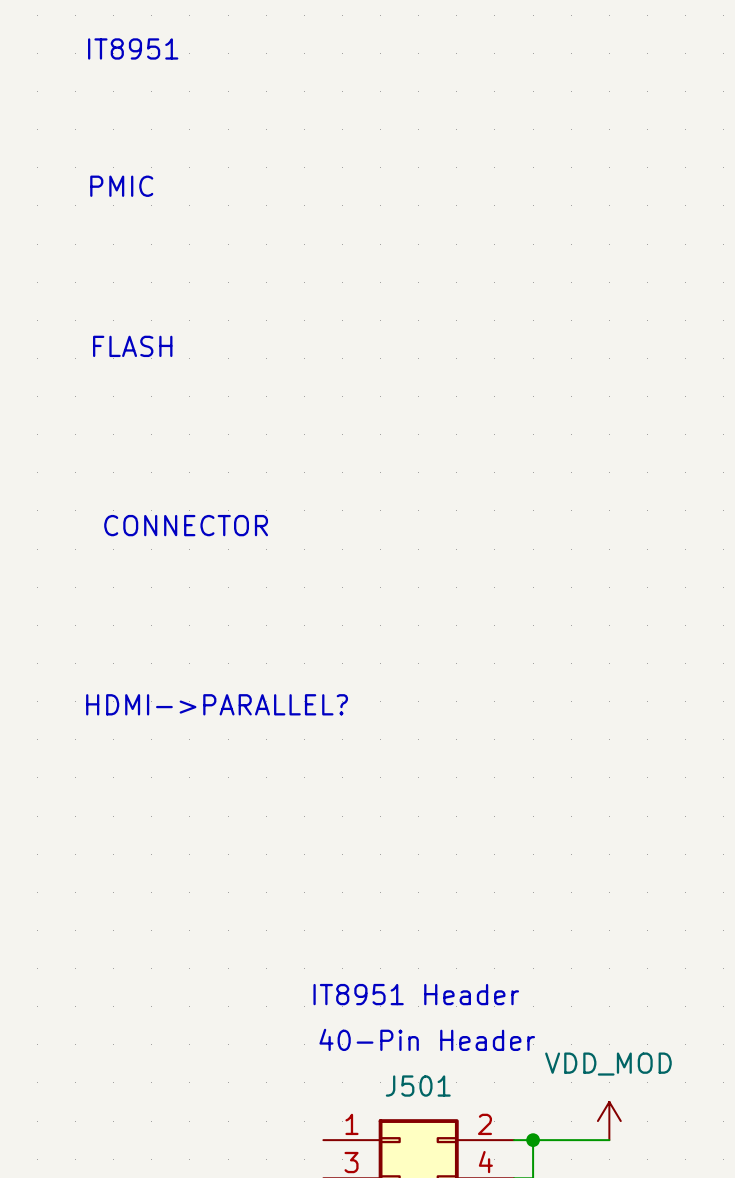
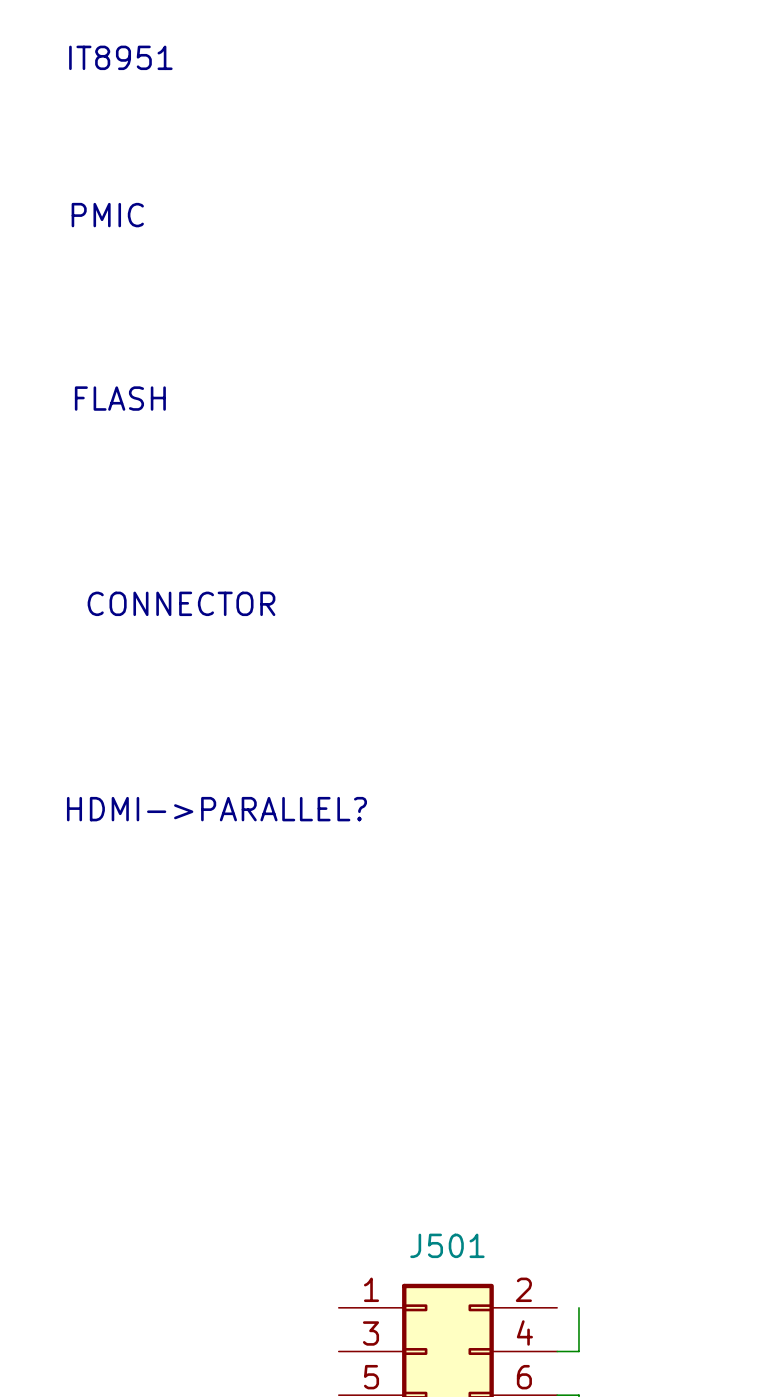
text: IT8951 Header (416, 994) -> none
text: 40-Pin Header (427, 1039) -> none
power symbol: VDD_MOD (609, 1121) -> none
wire: (514, 1140) (609, 1140) -> none
junction: (533, 1140) -> none

